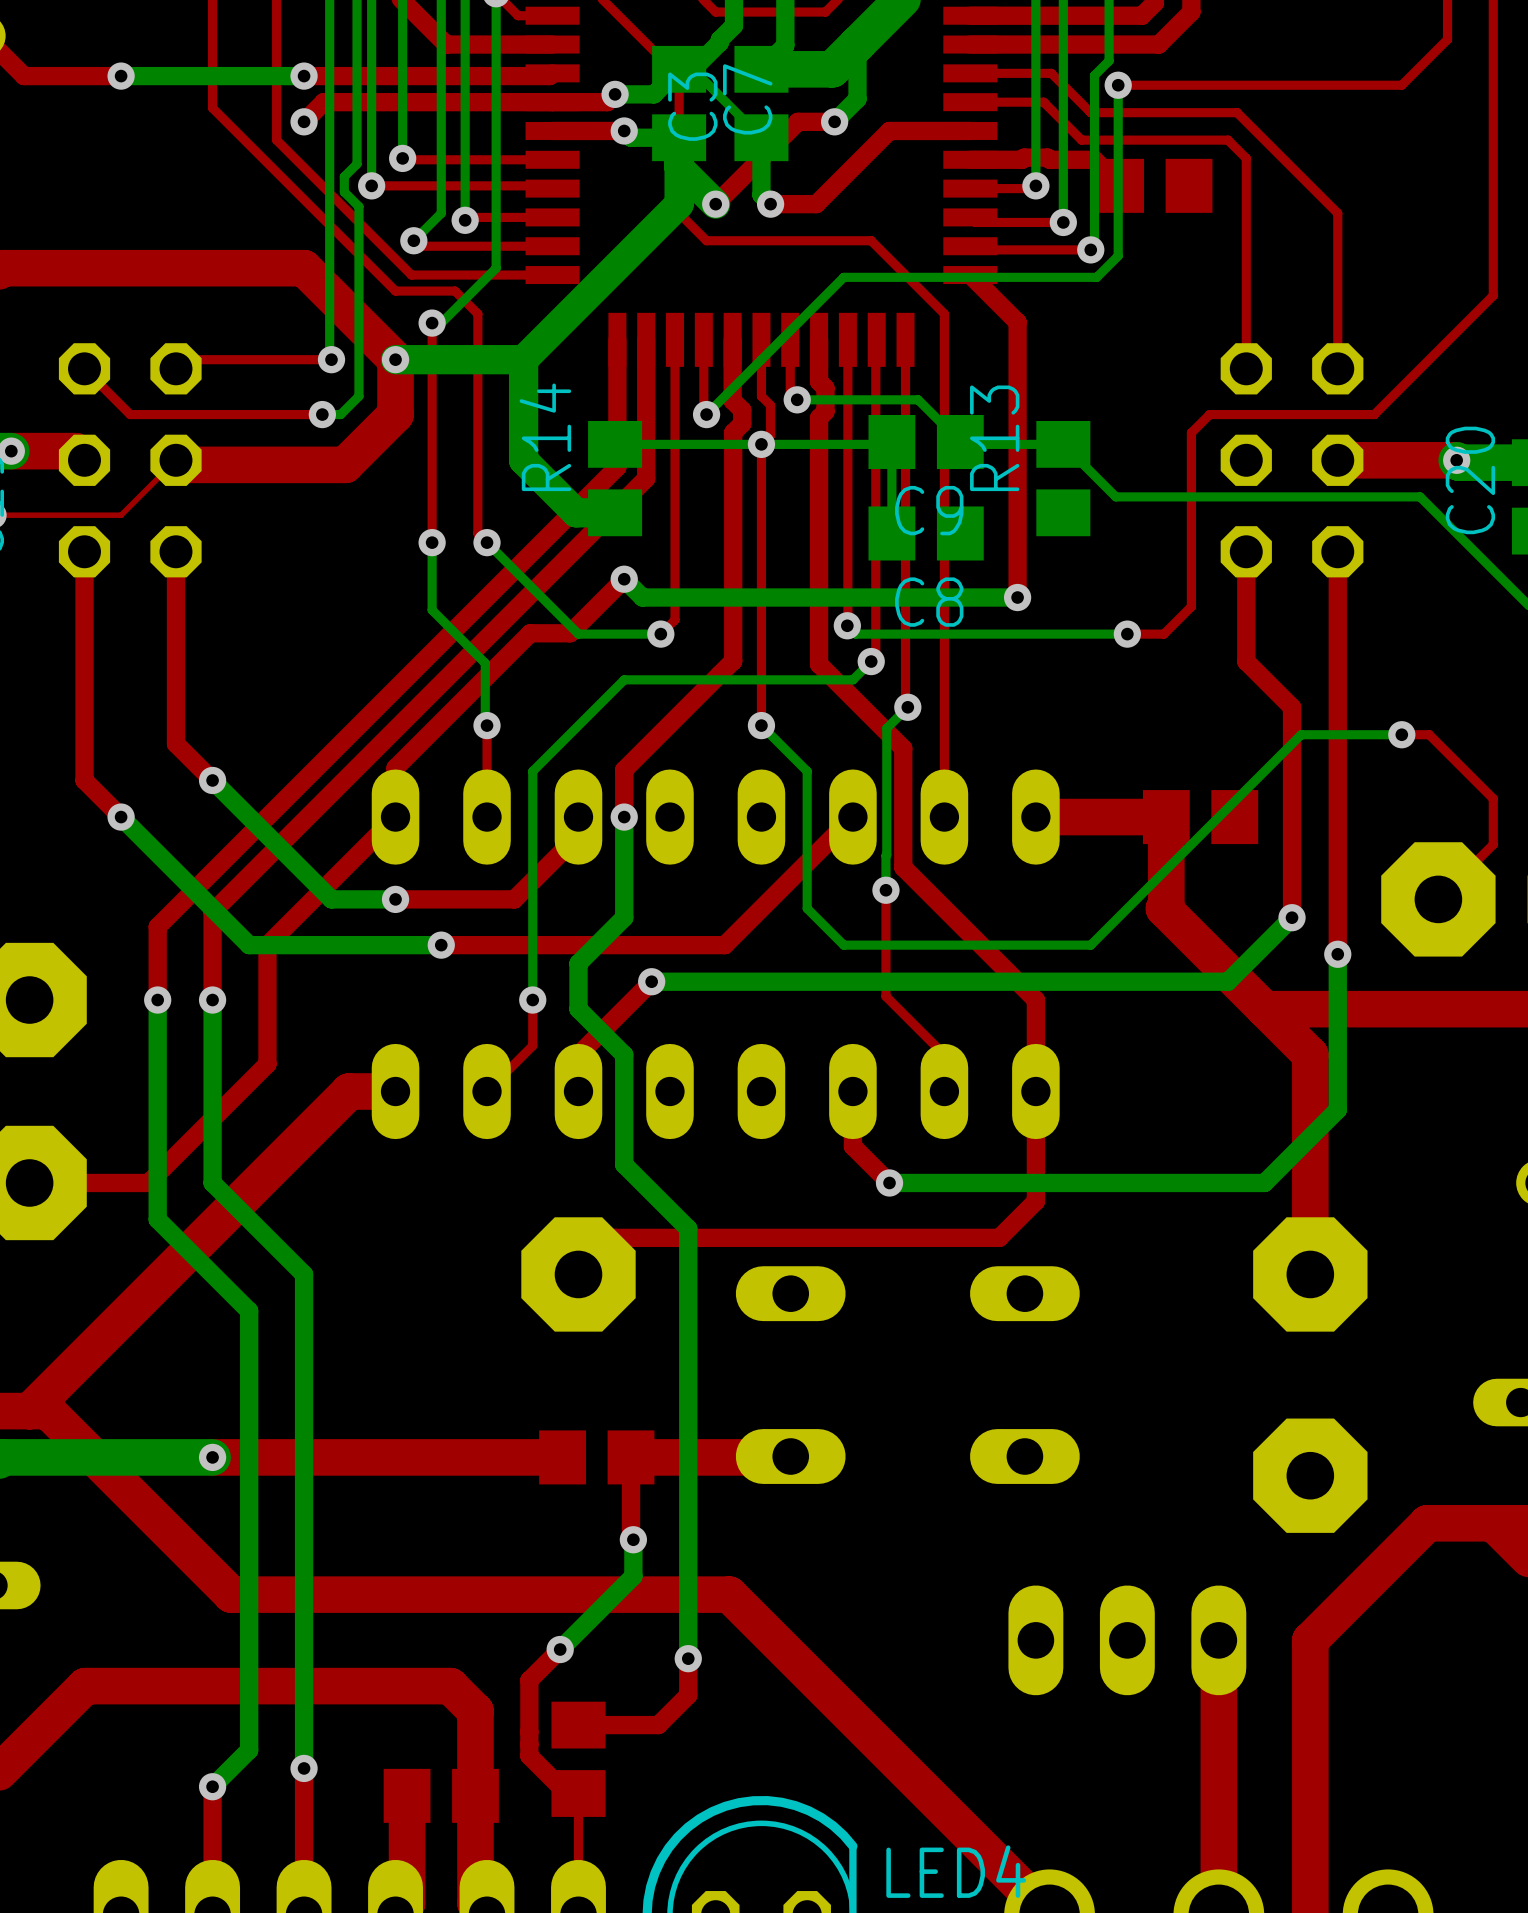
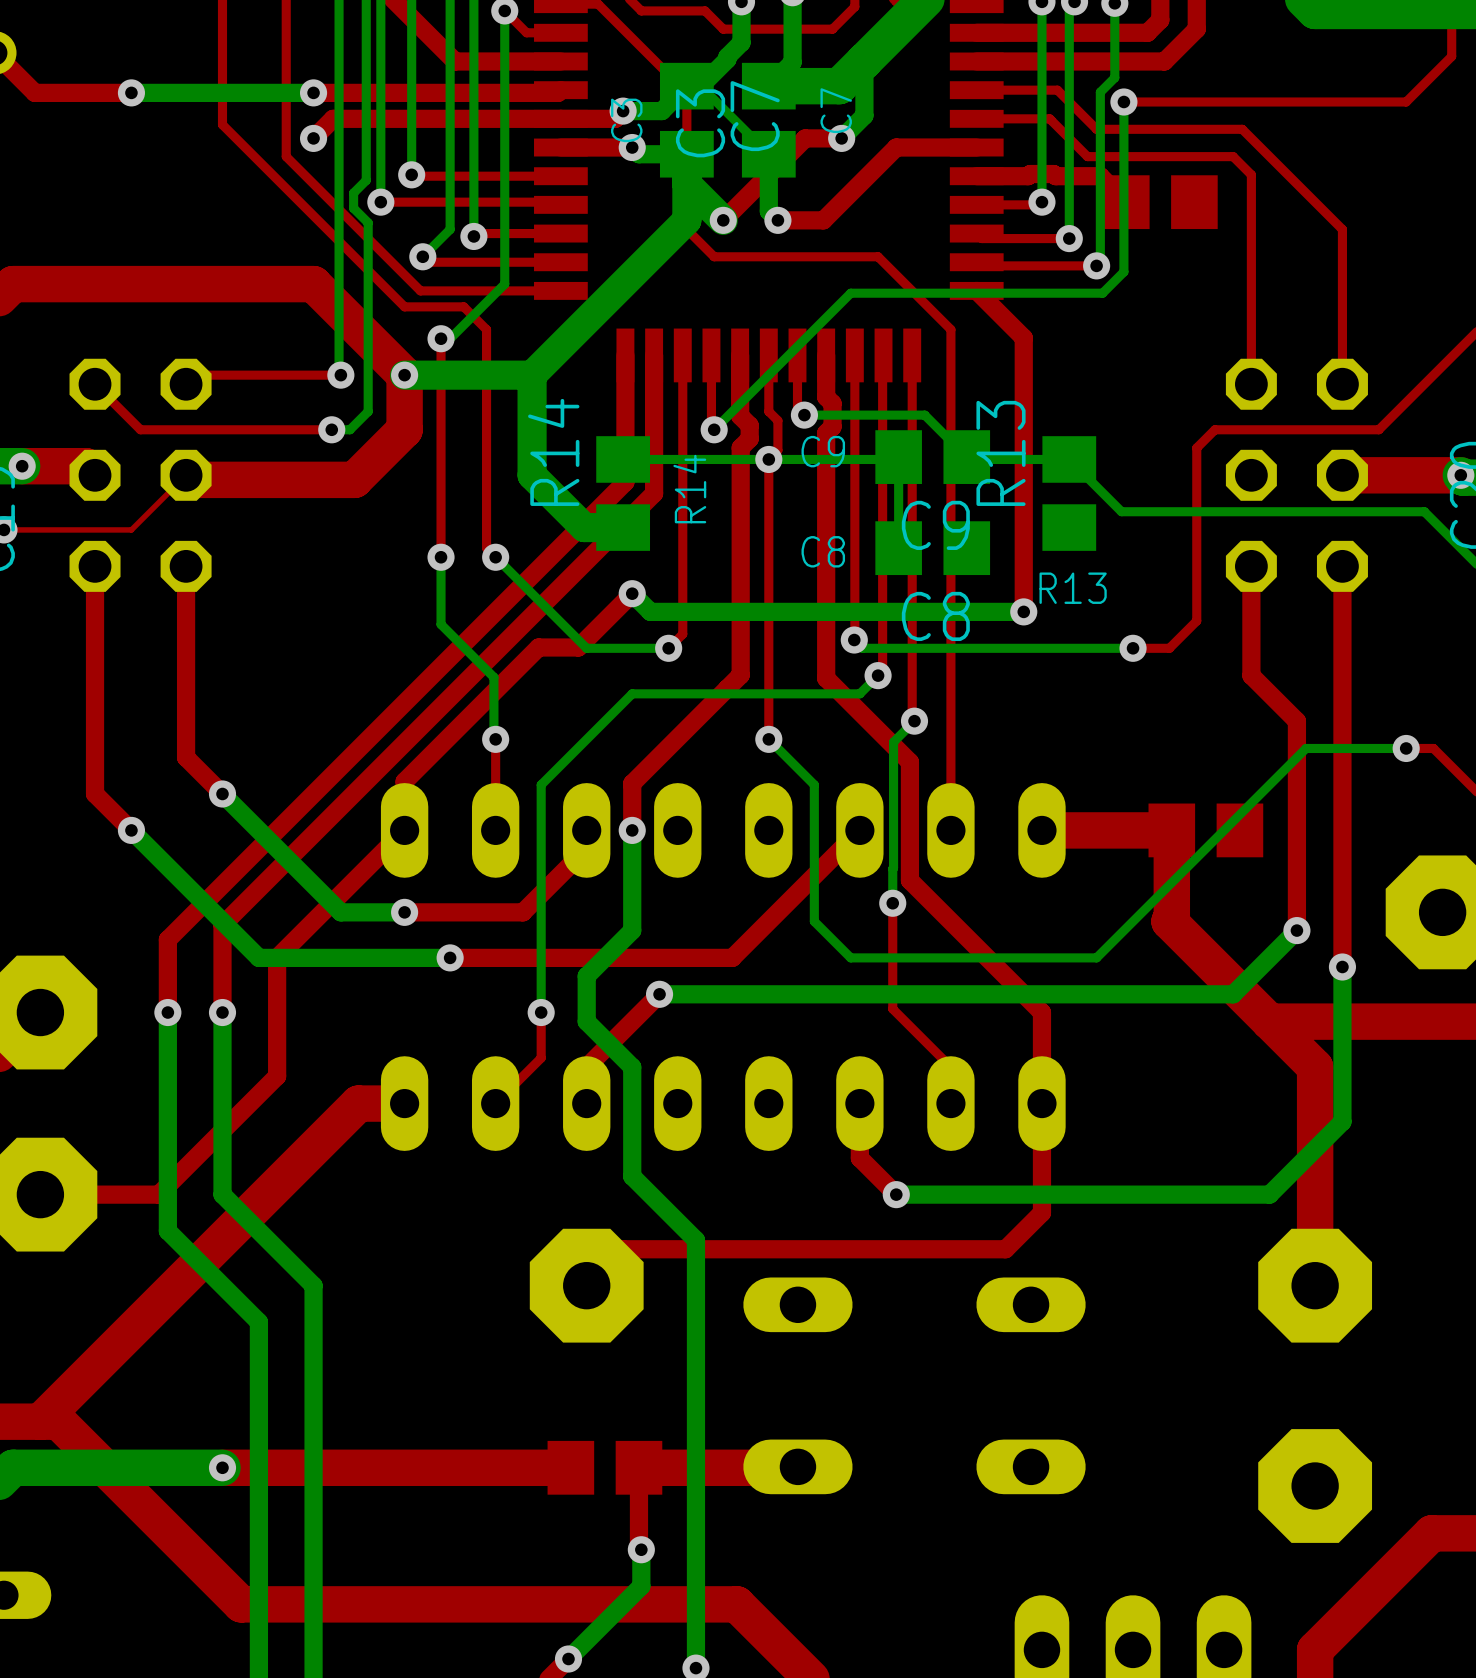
text: none -> C7 (836, 110)
text: none -> C3 (626, 120)
text: none -> C9 (823, 451)
text: none -> R14 (689, 489)
text: none -> C8 (823, 551)
text: none -> R13 (1073, 588)

